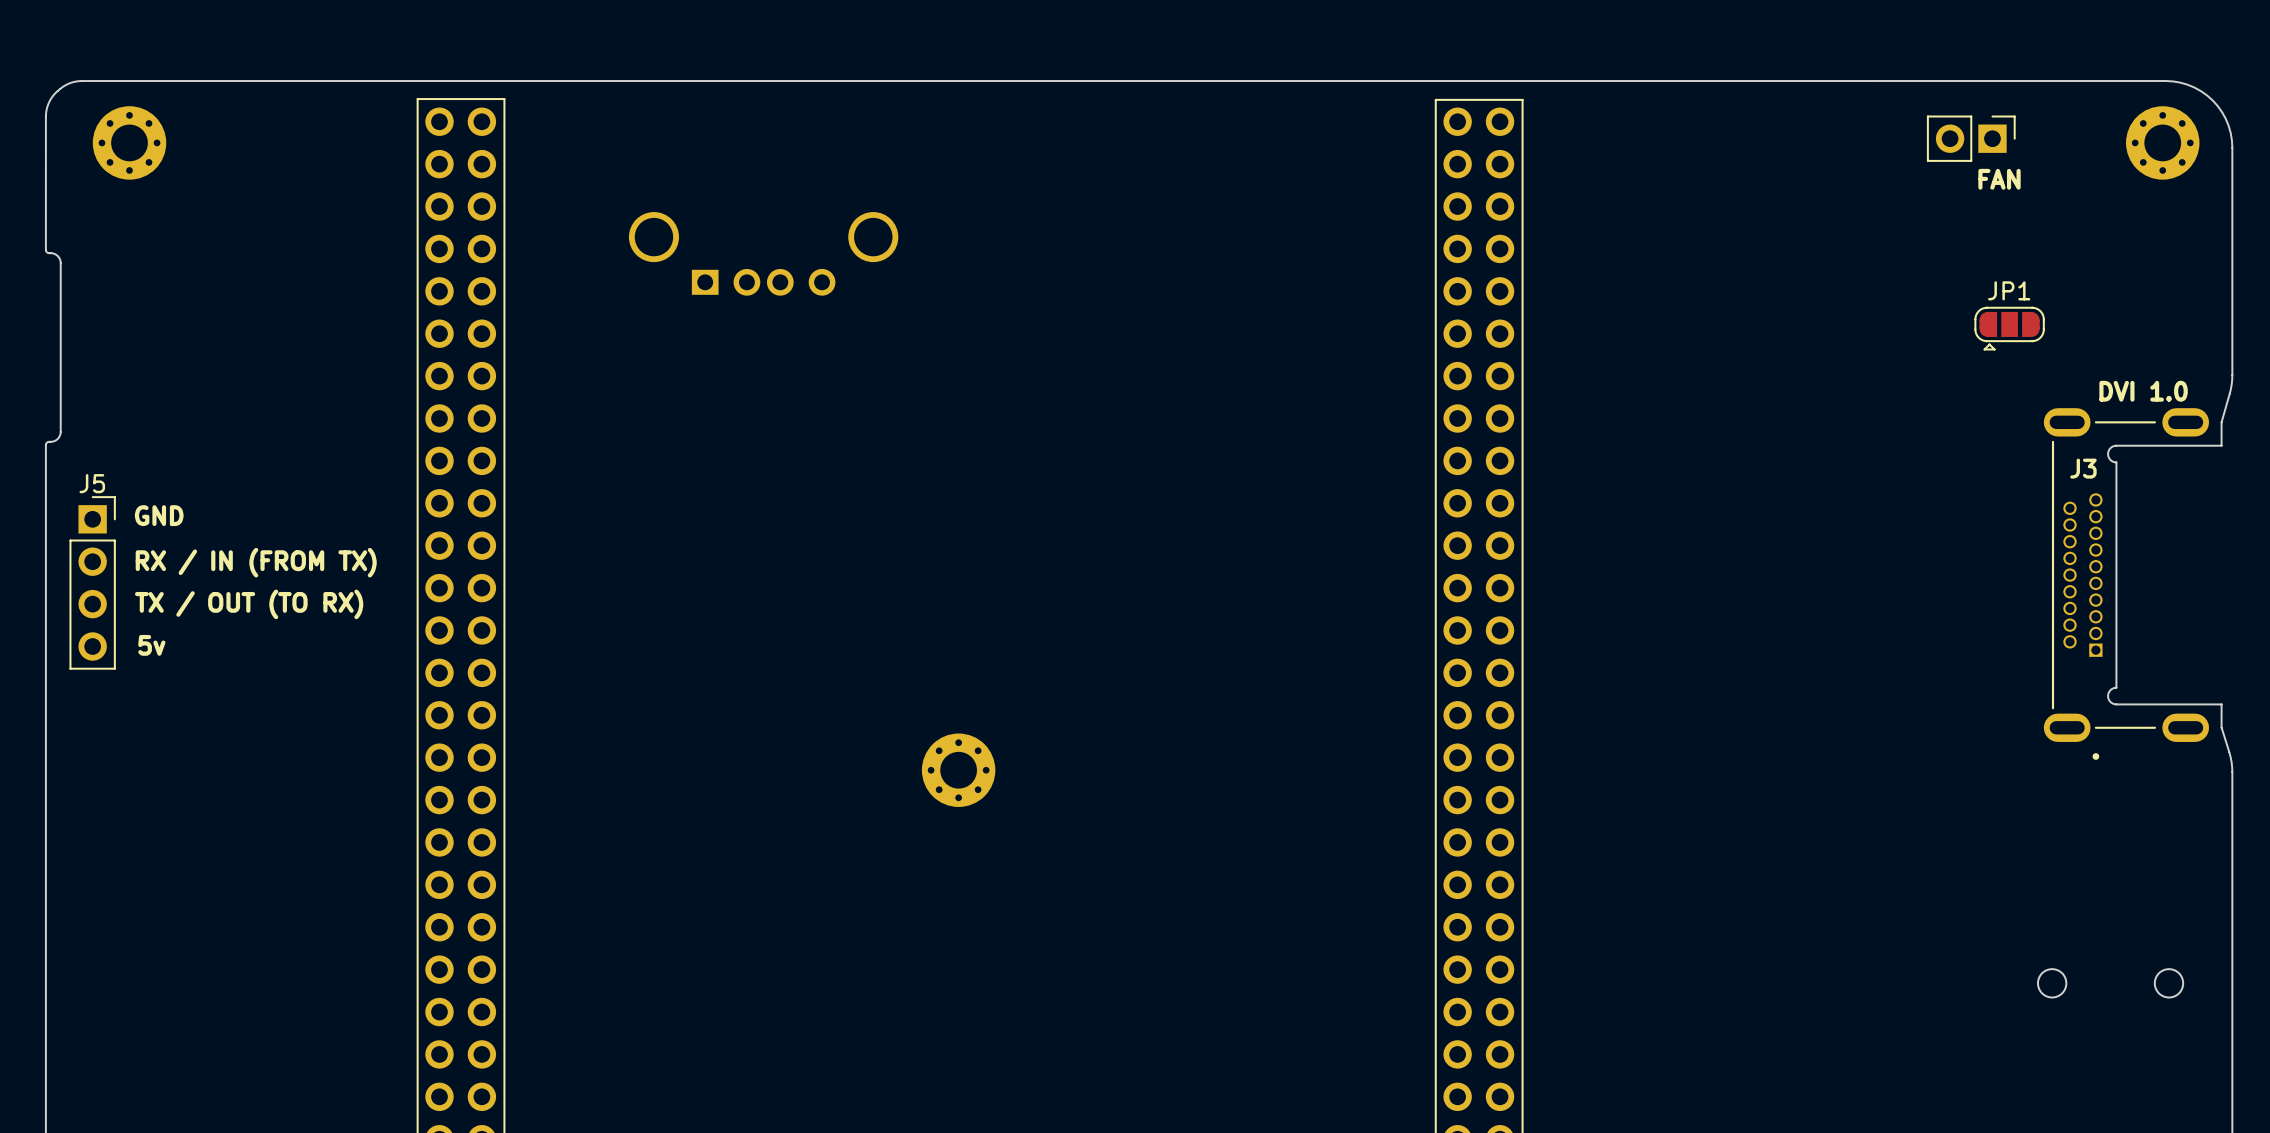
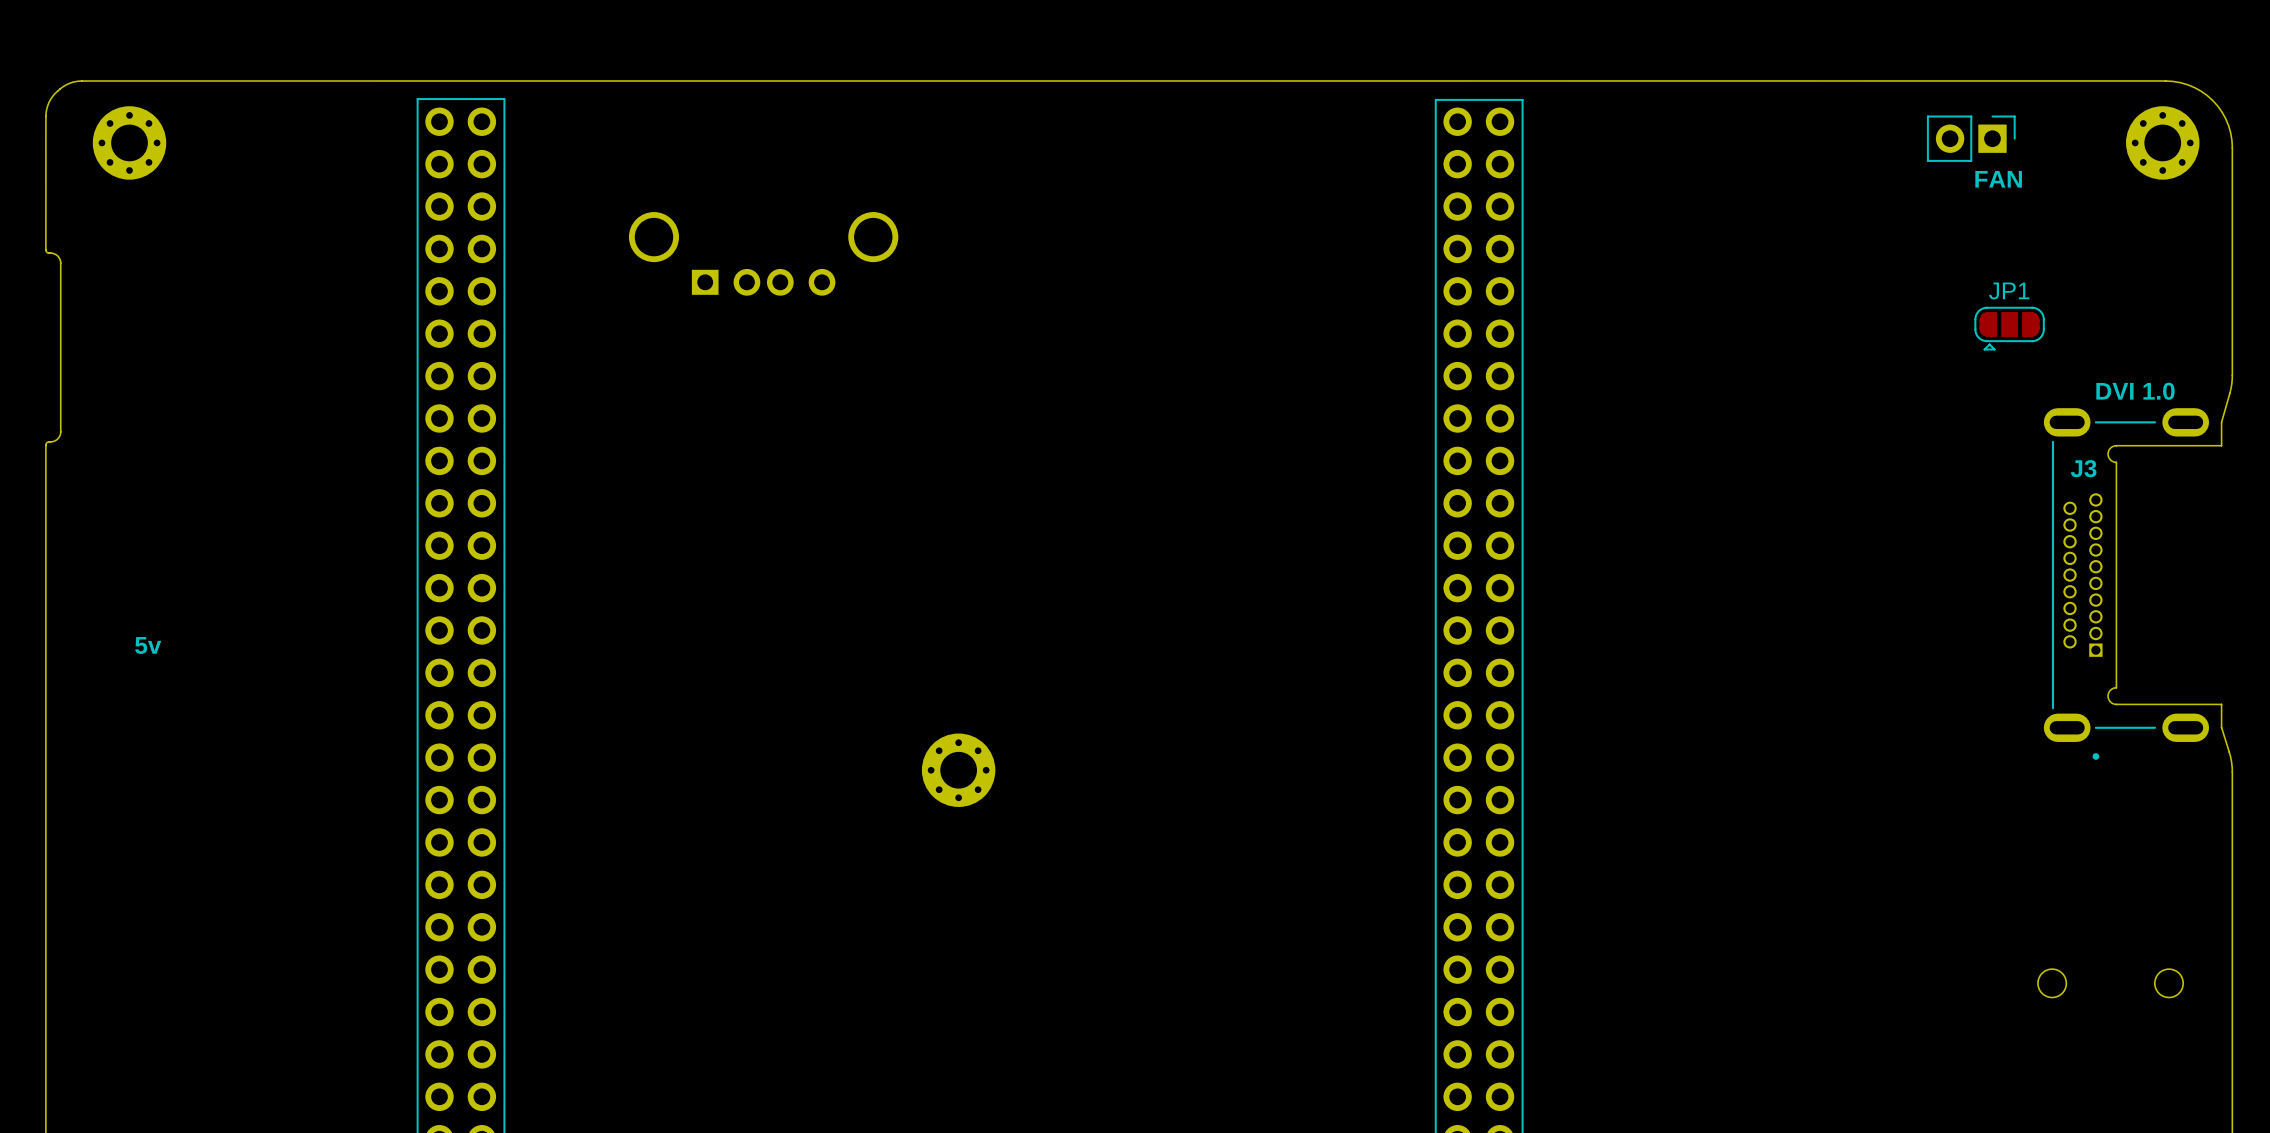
text: GND (159, 515) -> none
text: RX / IN (FROM TX) (256, 562) -> none
J5: (92, 582) -> none
text: TX / OUT (TO RX) (249, 604) -> none

